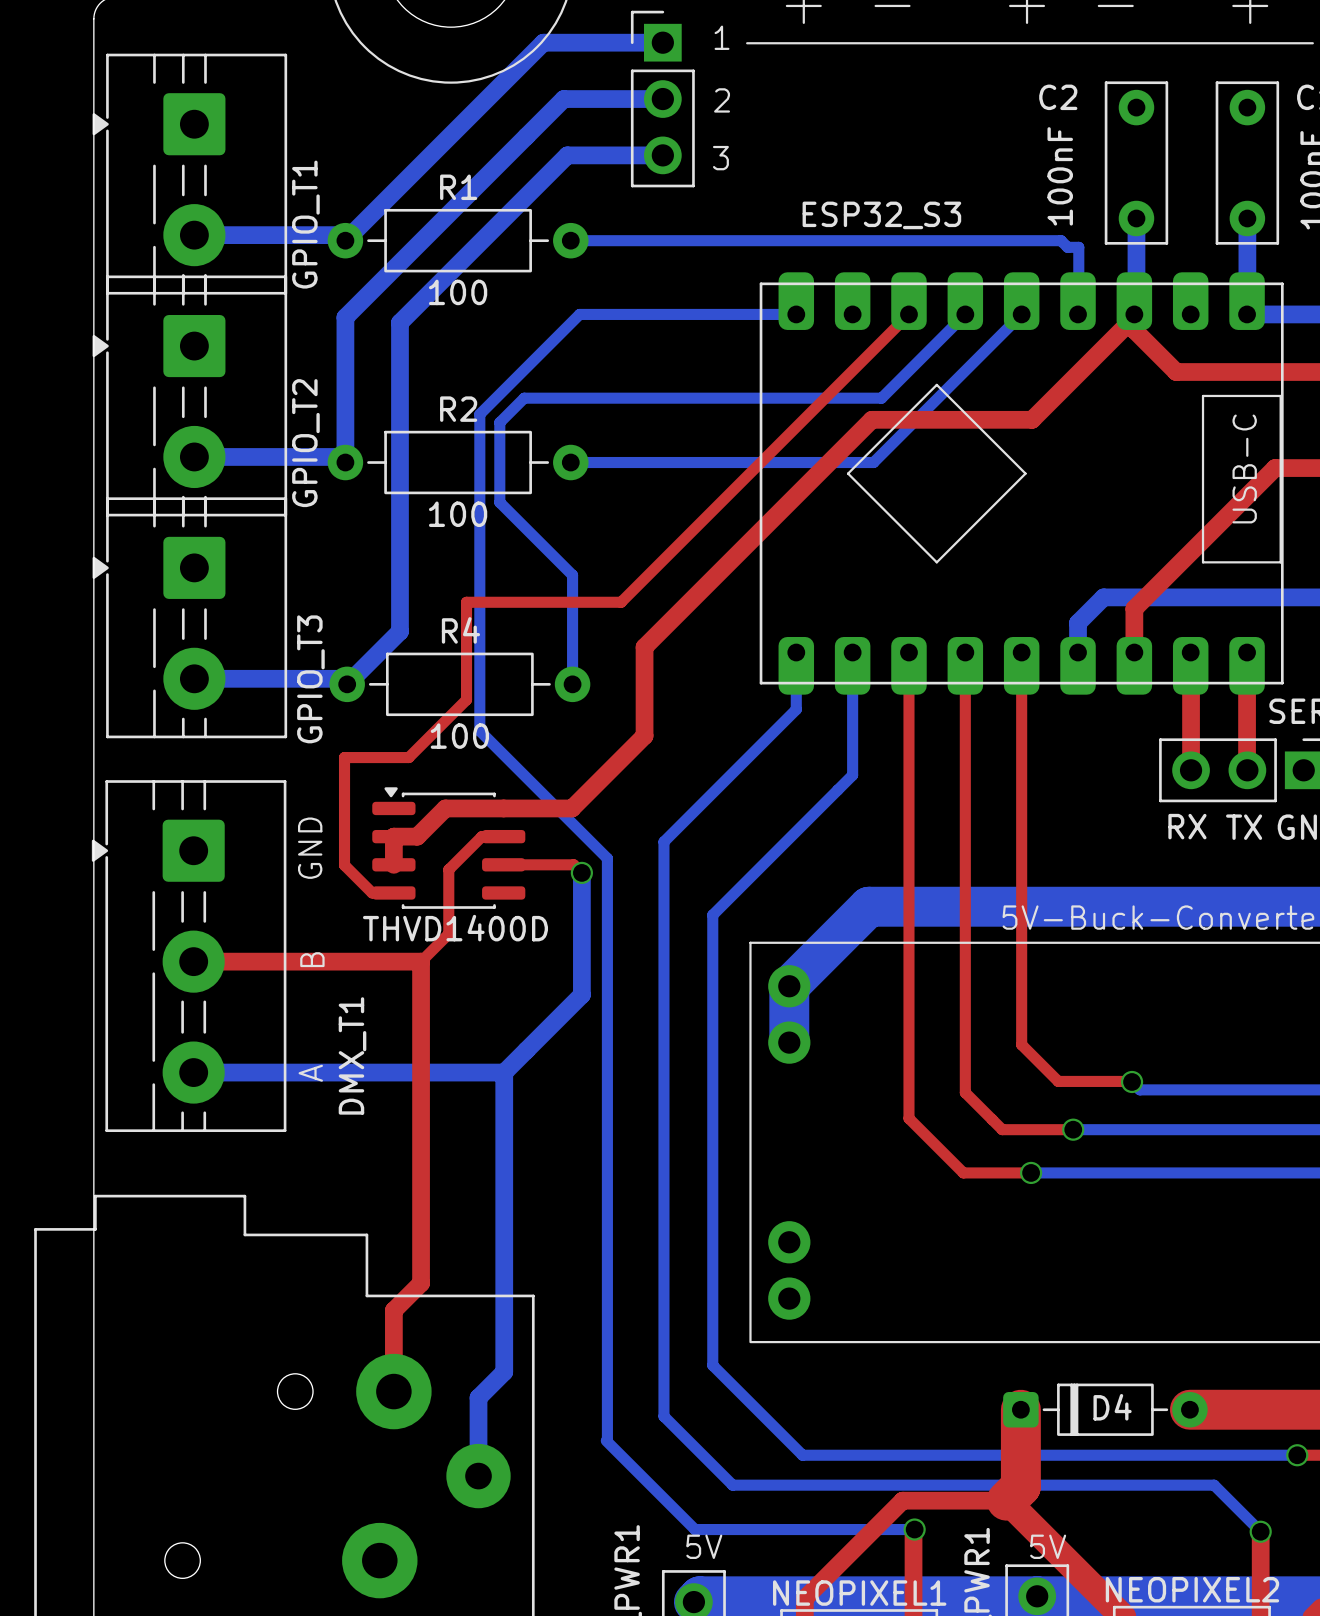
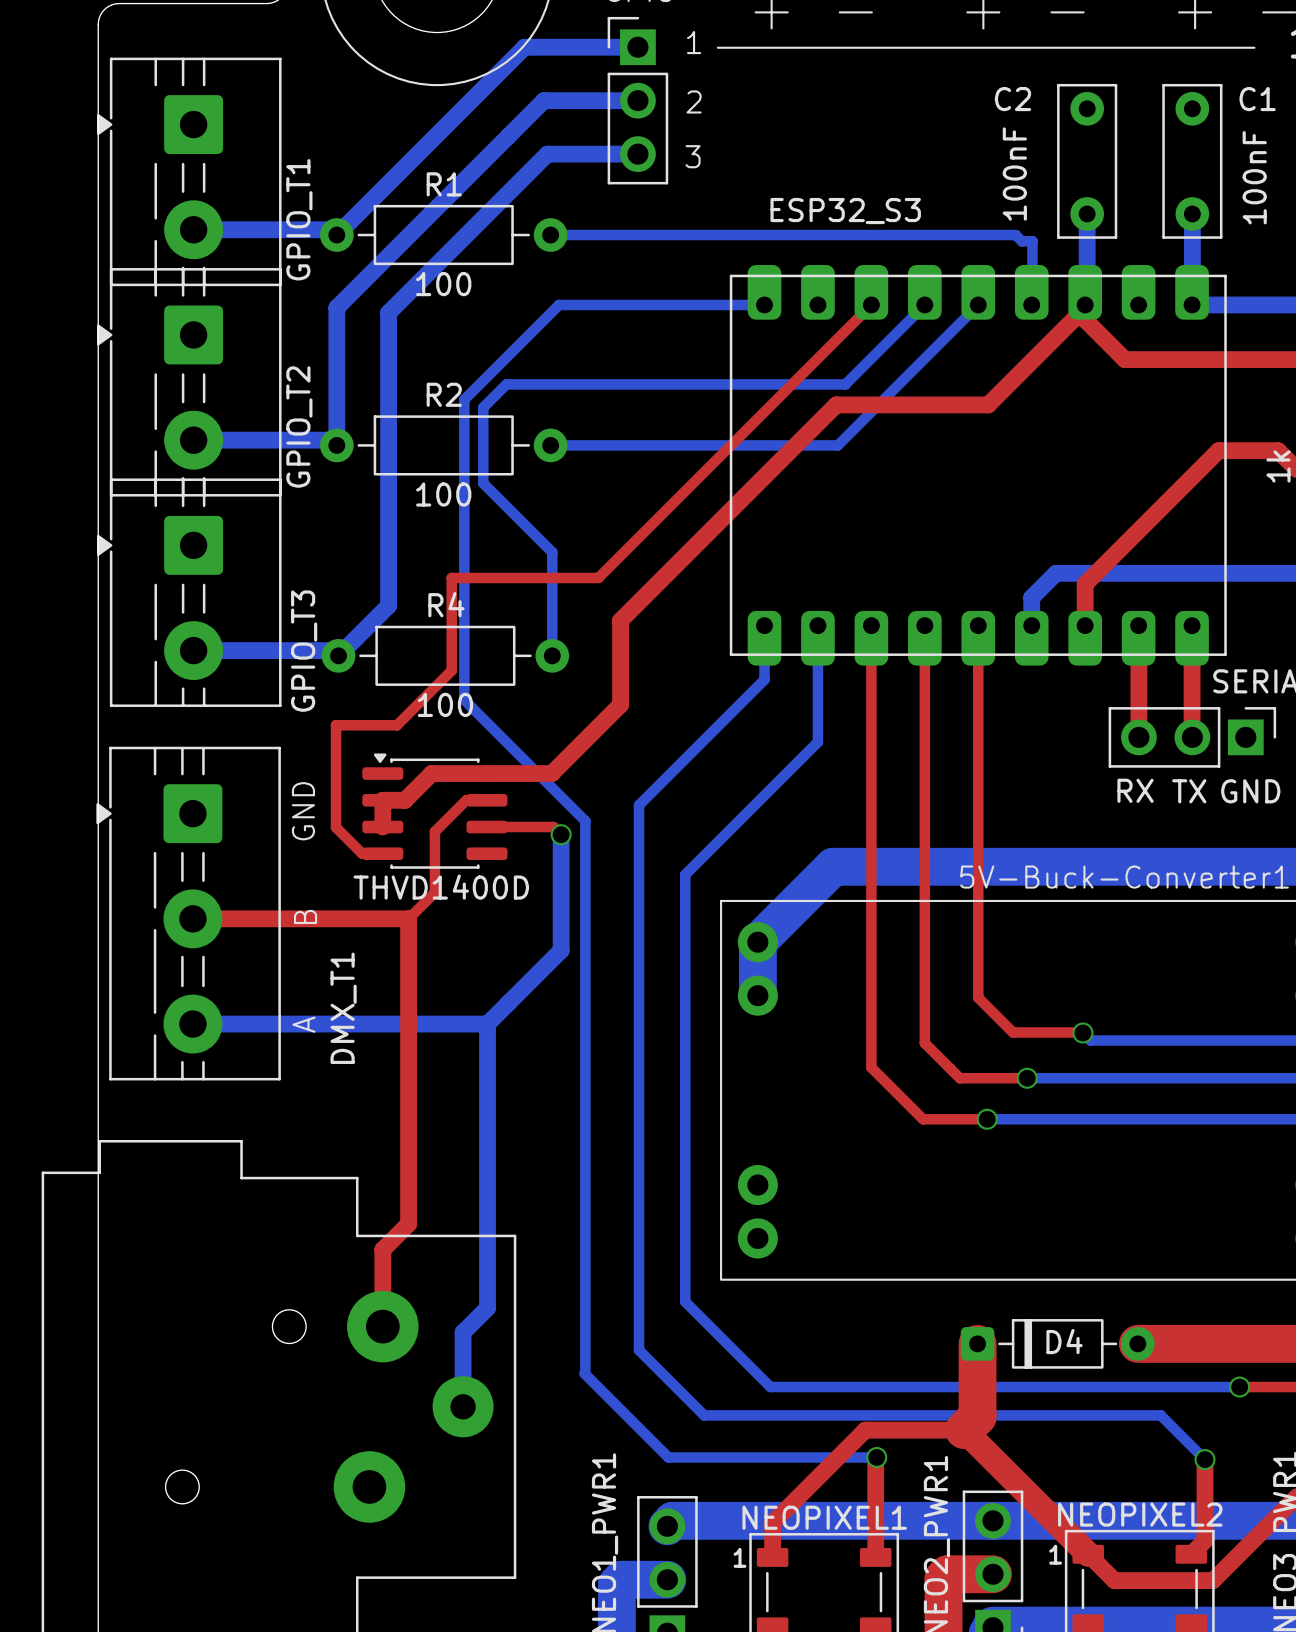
line: (936, 384) (1025, 473) (936, 562) (848, 473) (936, 384) -> none
line: (1203, 395) (1280, 395) (1280, 562) (1203, 562) (1203, 395) -> none
text: USB-C (1244, 468) -> none
text: 5V (704, 1546) -> none
text: 5V (1048, 1546) -> none

